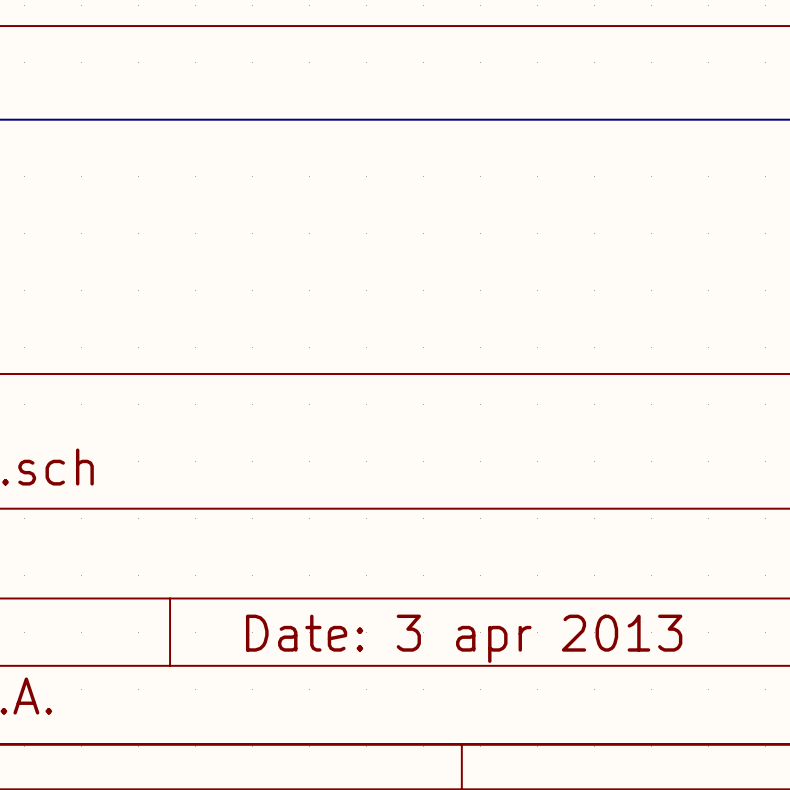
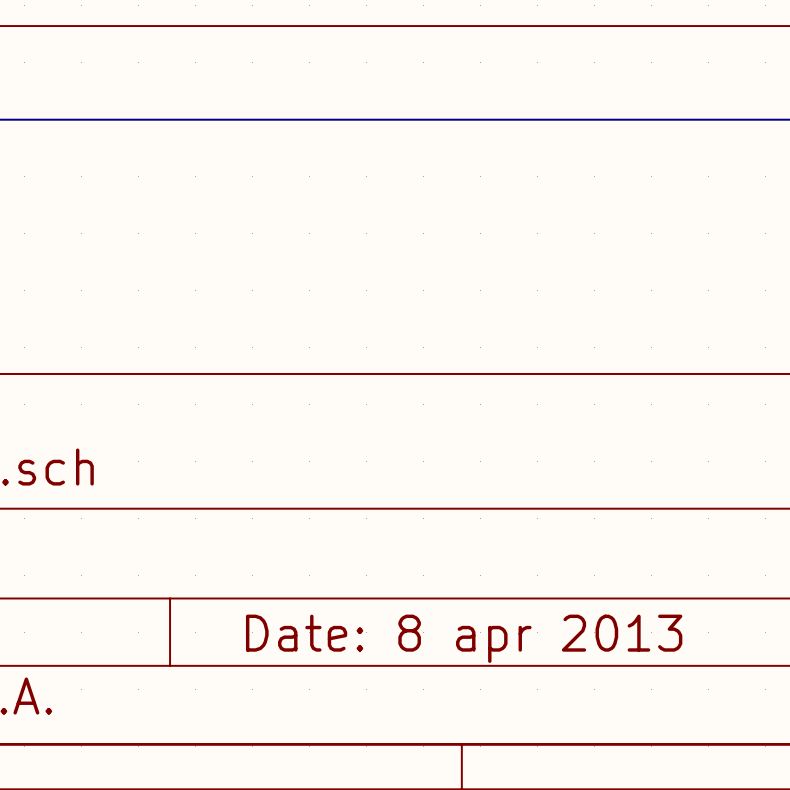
title block: Date: 3 apr 2013 (464, 638) -> Date: 8 apr 2013 (464, 638)

